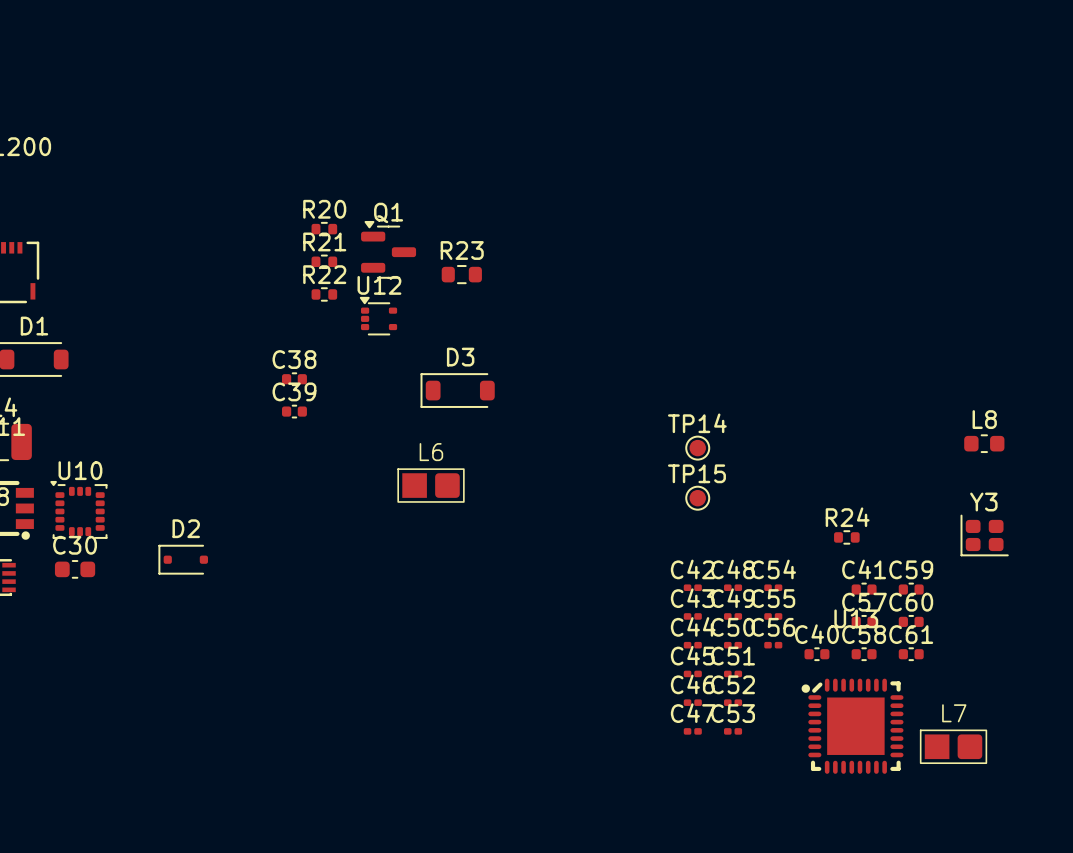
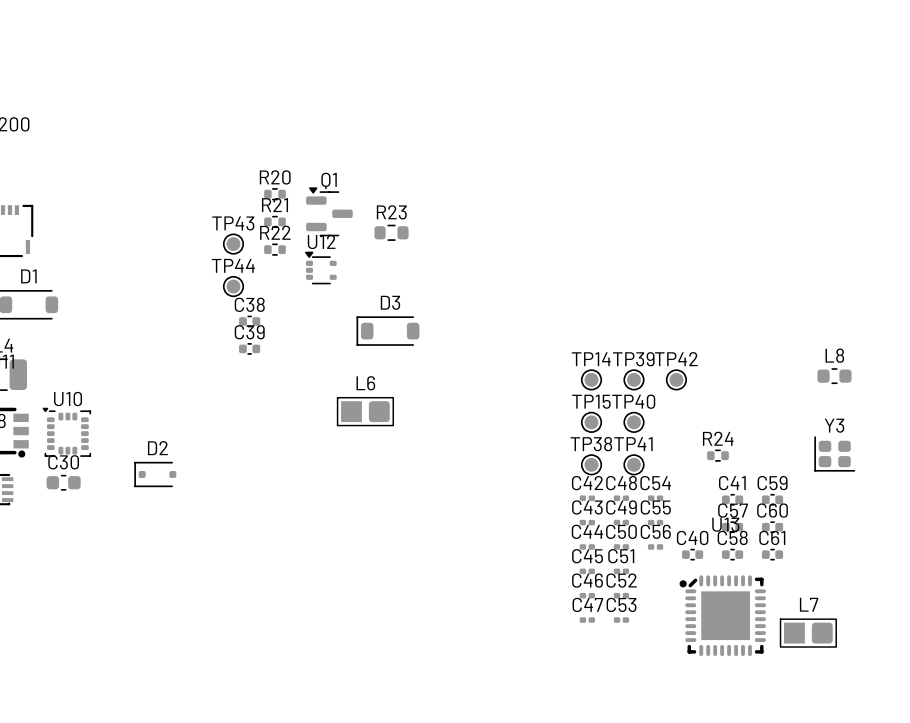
TP43: none -> (233, 244)
TP44: none -> (233, 286)
TP39: none -> (633, 379)
TP42: none -> (676, 379)
TP40: none -> (633, 422)
TP38: none -> (591, 464)
TP41: none -> (633, 464)

